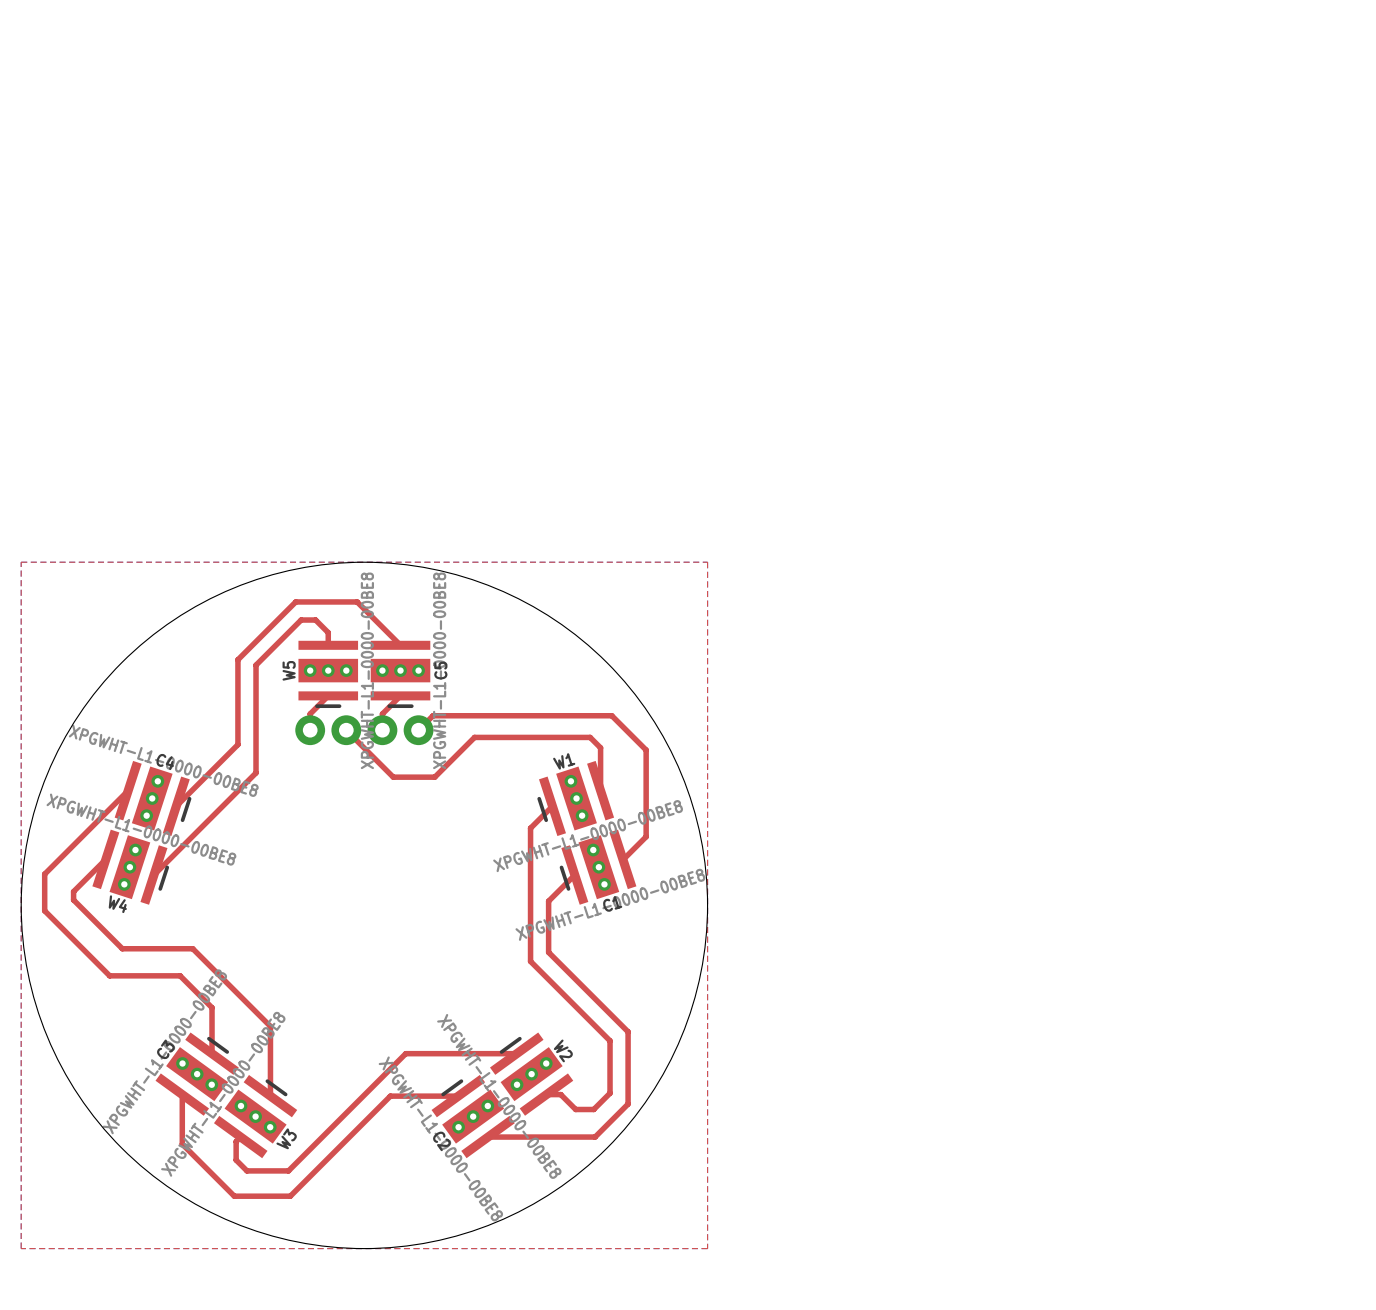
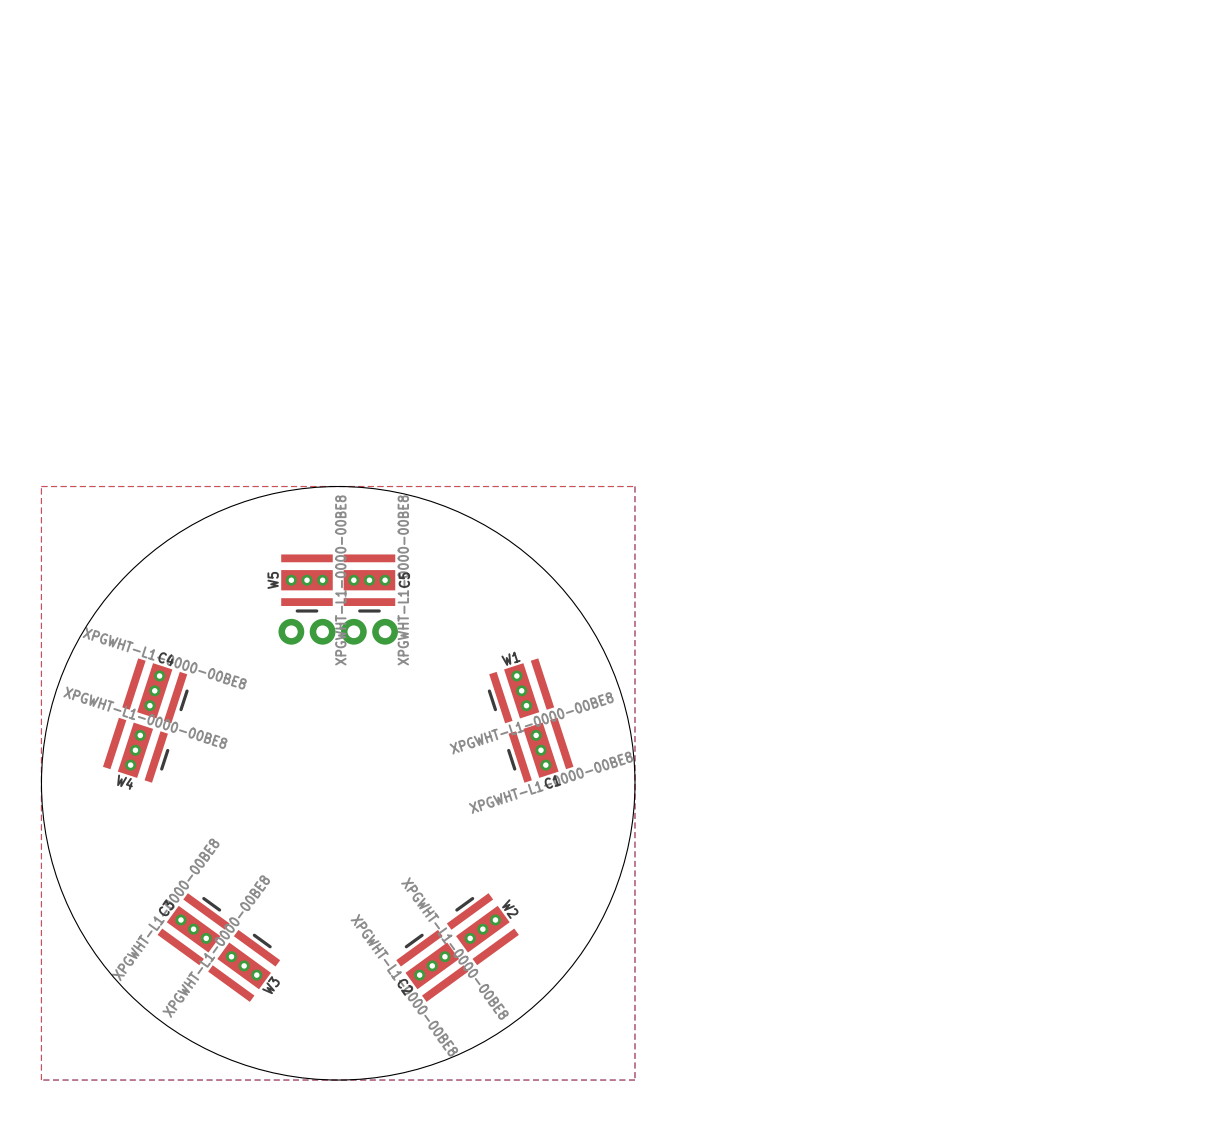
top track: (328, 645) (328, 632) (315, 620) (301, 620) (256, 665) (256, 772) (153, 875) -> none
top track: (400, 645) (357, 601) (295, 601) (237, 659) (237, 744) (176, 806) -> none
top track: (328, 695) (310, 713) (310, 730) -> none
top track: (400, 695) (382, 713) (382, 730) -> none
top track: (346, 730) (393, 777) (434, 777) (474, 737) (590, 737) (600, 747) (600, 790) -> none
top track: (418, 730) (433, 715) (611, 715) (646, 750) (646, 836) (622, 859) -> none
top track: (128, 790) (44, 874) (44, 910) (109, 975) (180, 975) (212, 1007) (212, 1053) -> none
top track: (552, 806) (530, 828) (530, 961) (610, 1040) (610, 1093) (593, 1109) (575, 1109) (560, 1094) (546, 1094) -> none
top track: (105, 859) (73, 891) (73, 899) (122, 948) (192, 948) (270, 1026) (270, 1096) -> none
top track: (574, 875) (548, 901) (548, 952) (628, 1031) (628, 1104) (595, 1137) (488, 1137) -> none
top track: (516, 1053) (405, 1053) (288, 1170) (246, 1170) (236, 1160) (236, 1141) (240, 1137) -> none
top track: (182, 1094) (182, 1144) (234, 1196) (290, 1196) (390, 1096) (458, 1096) -> none

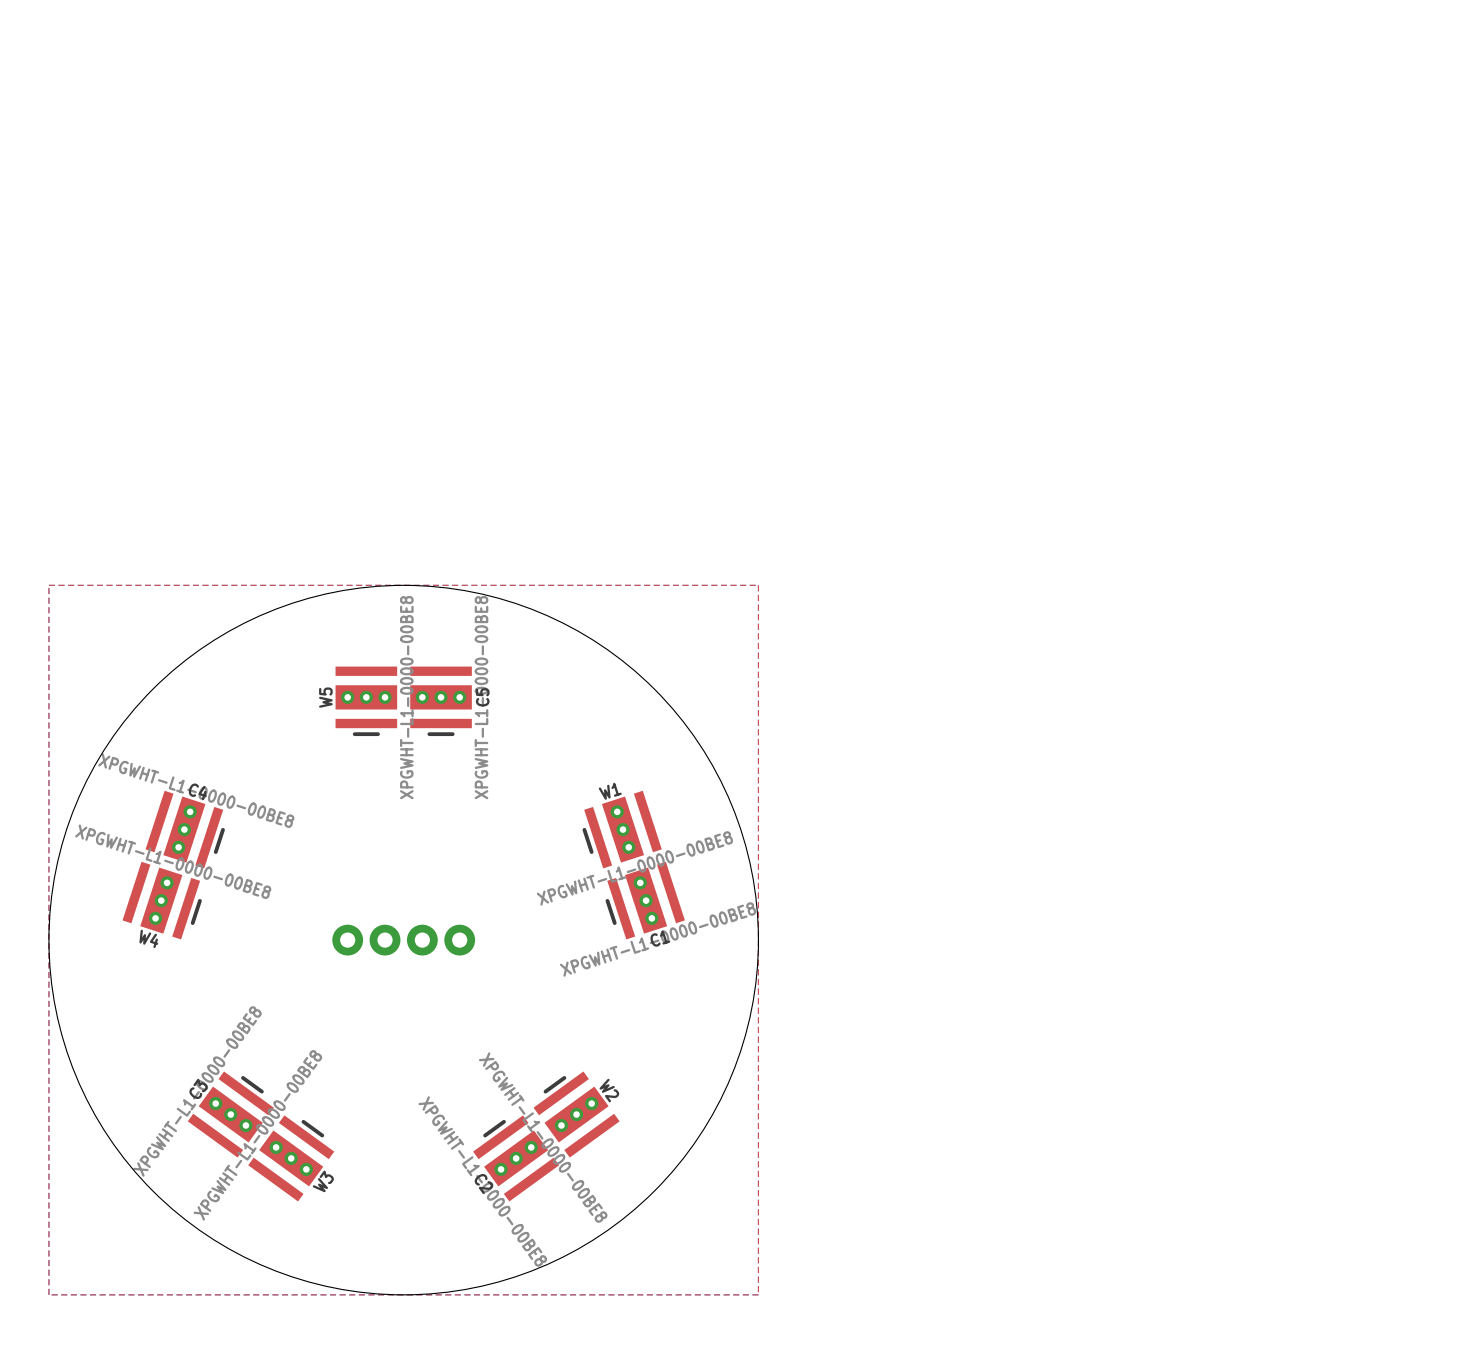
part: (291, 631) -> none
part: (322, 631) -> none
part: (353, 631) -> none
part: (385, 631) -> none
part: none -> (347, 940)
part: none -> (385, 940)
part: none -> (422, 940)
part: none -> (459, 940)

